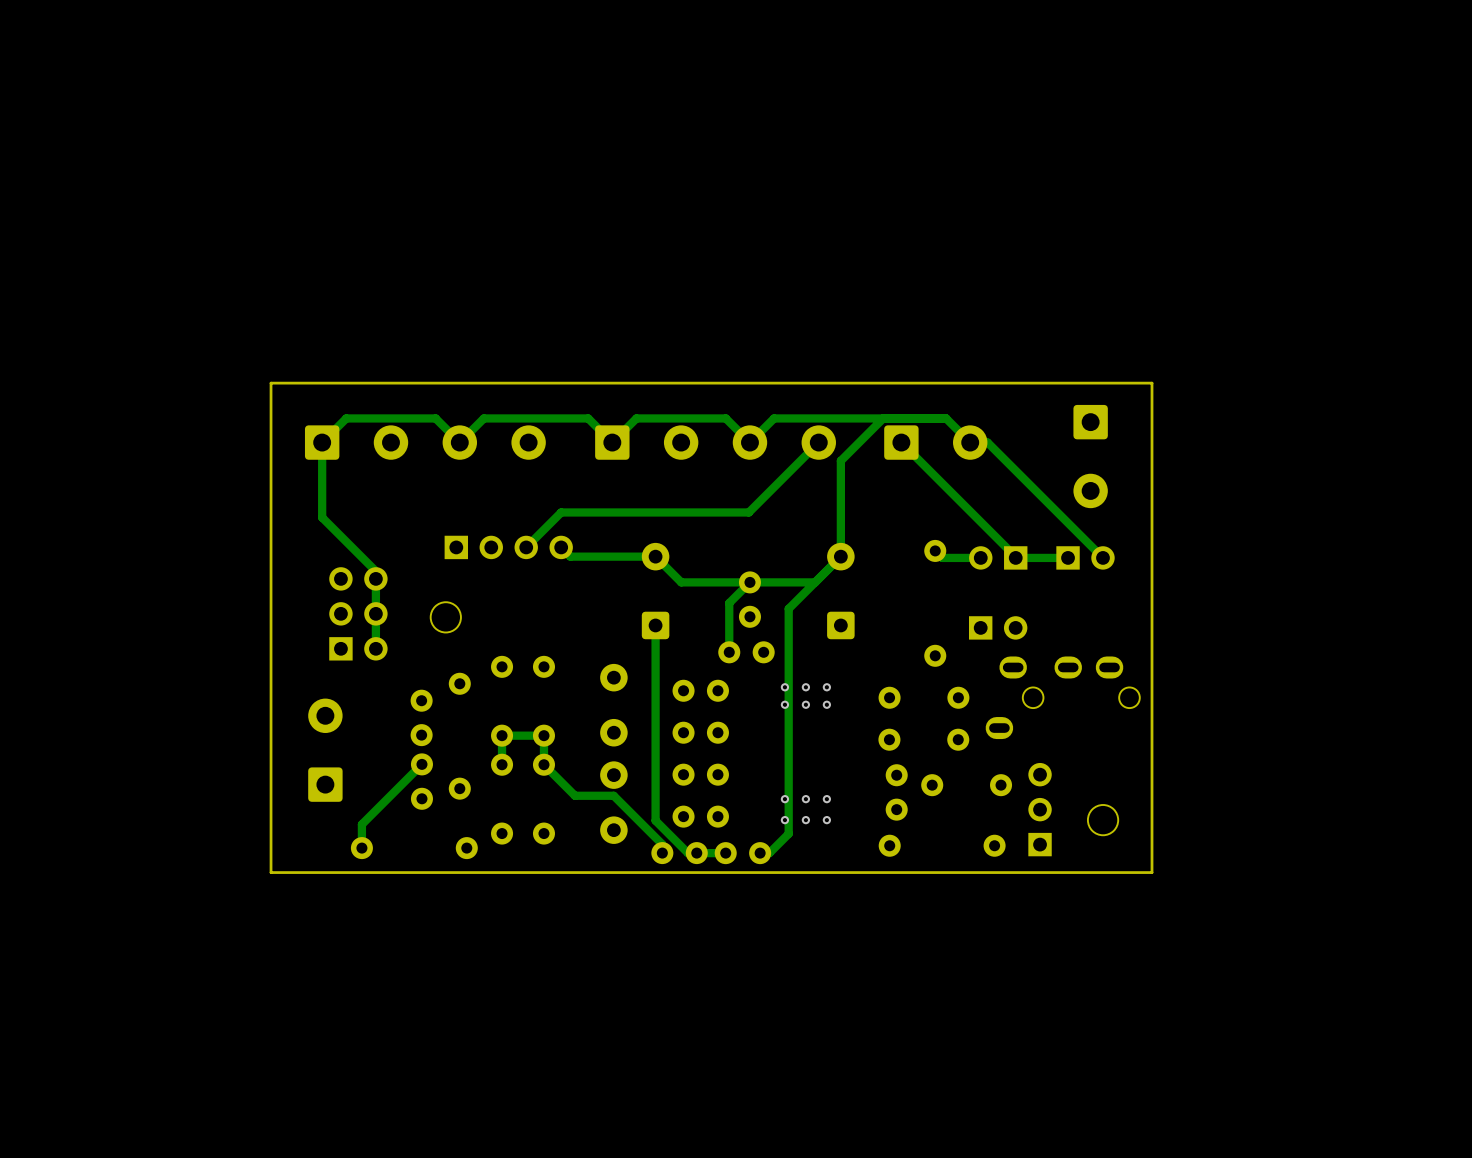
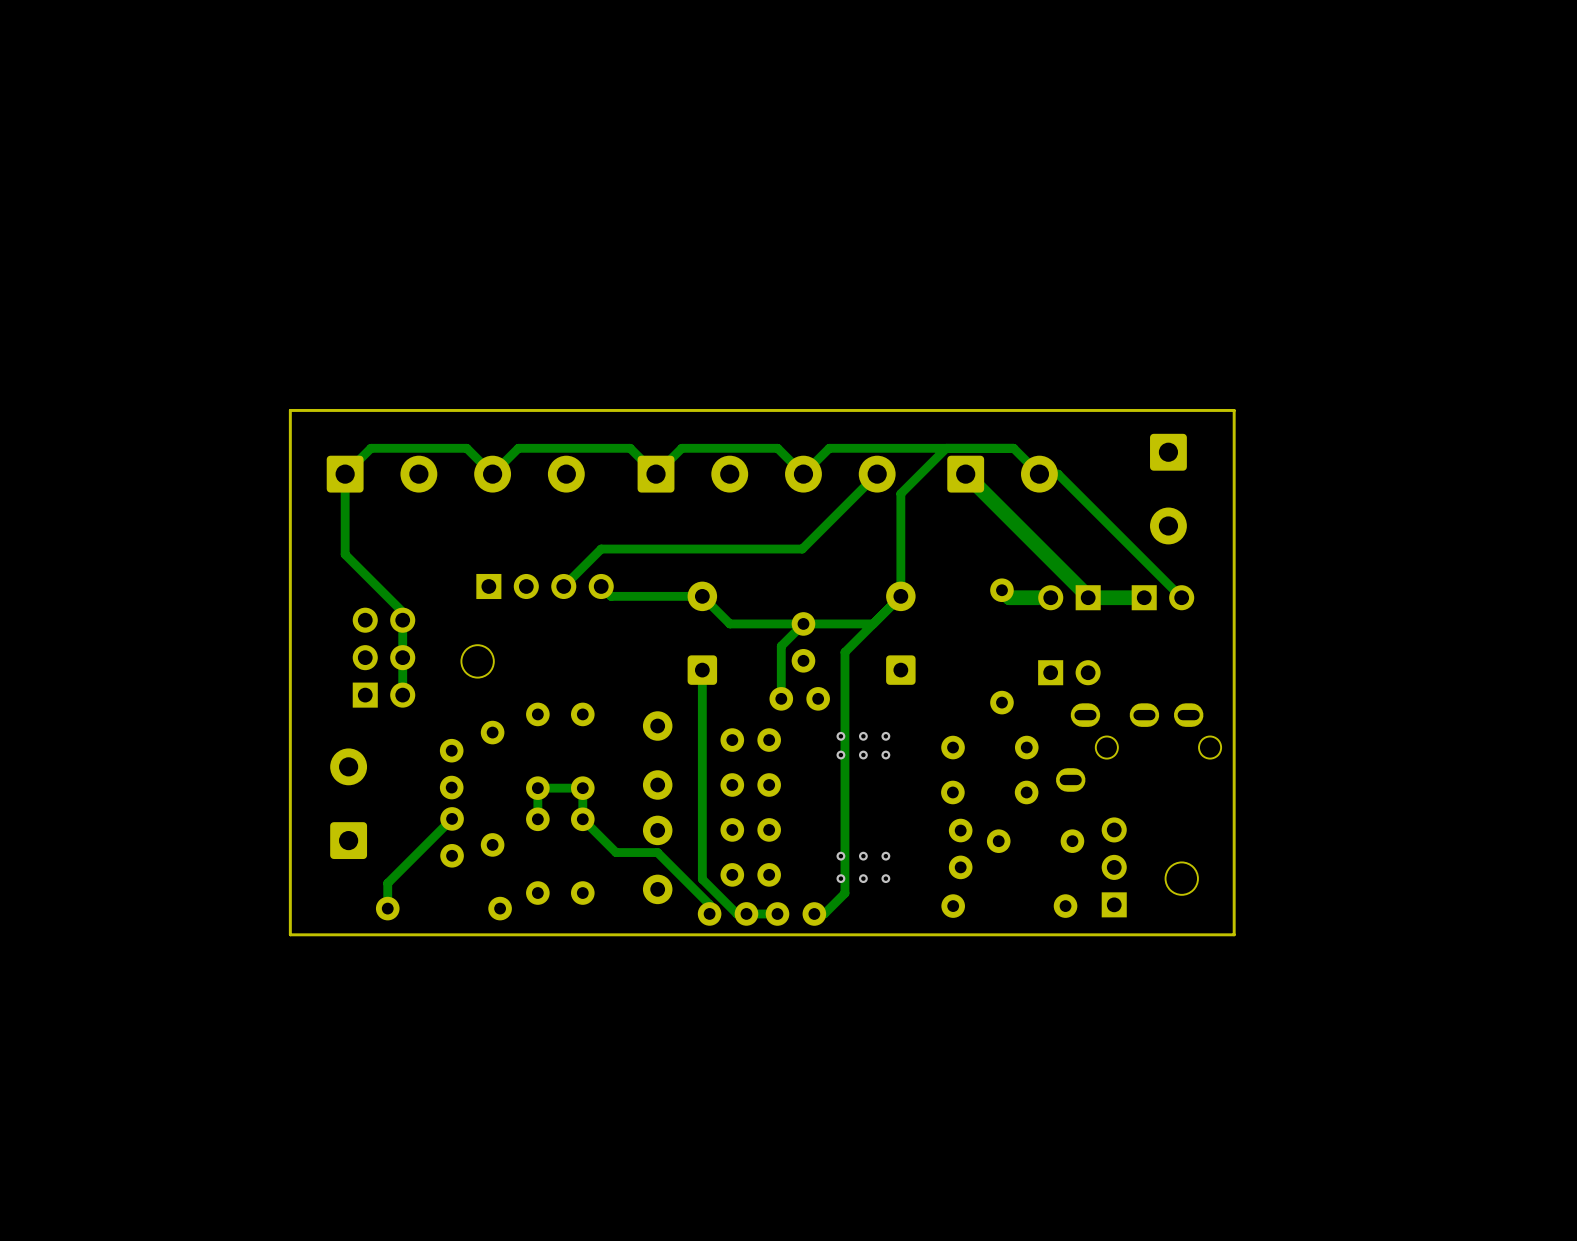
track width: thin (901, 442) (1015, 557) -> thick (965, 474) (1088, 597)
track width: thin (935, 550) (942, 557) (980, 557) -> thick (1001, 590) (1009, 597) (1050, 597)
track width: thin (1068, 557) (1019, 557) -> thick (1144, 597) (1091, 597)

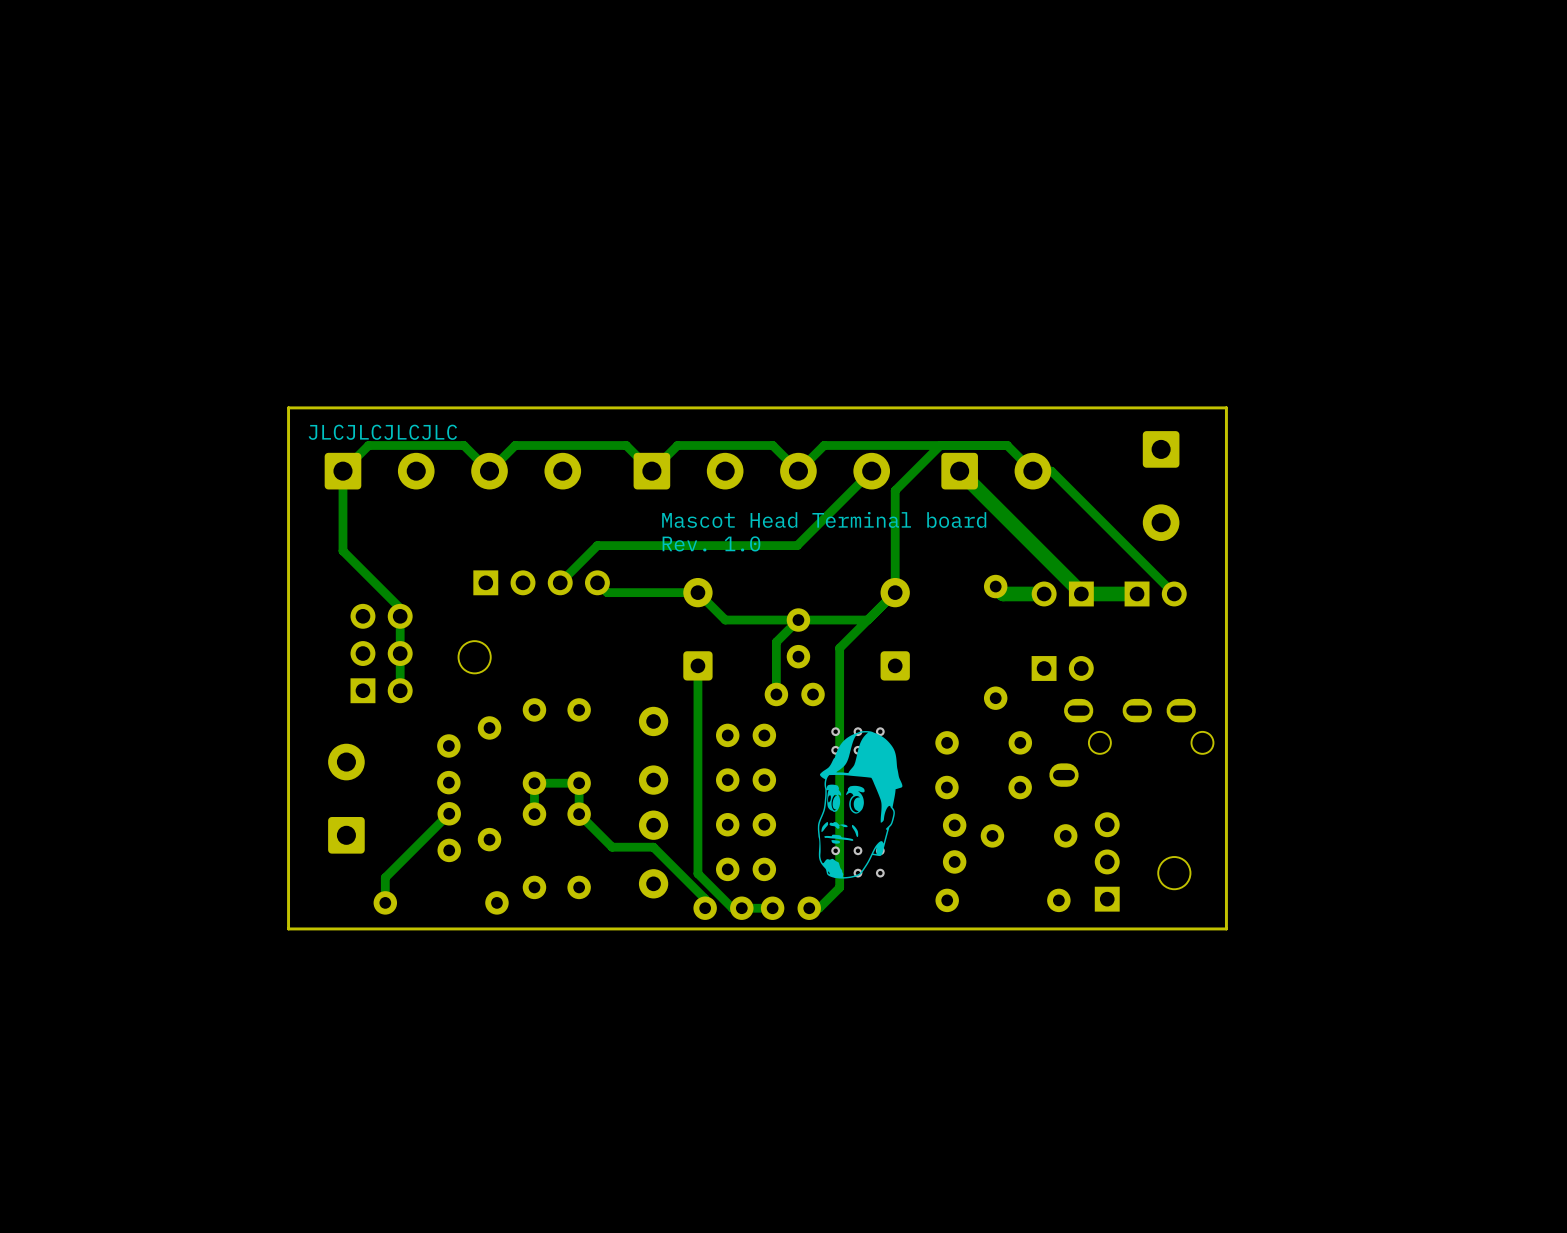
text: none -> JLCJLCJLCJLC (382, 432)
text: none -> Mascot Head Terminal board (824, 519)
text: none -> Rev. 1.0 (711, 543)
drawing: none -> [817, 731, 903, 879]

